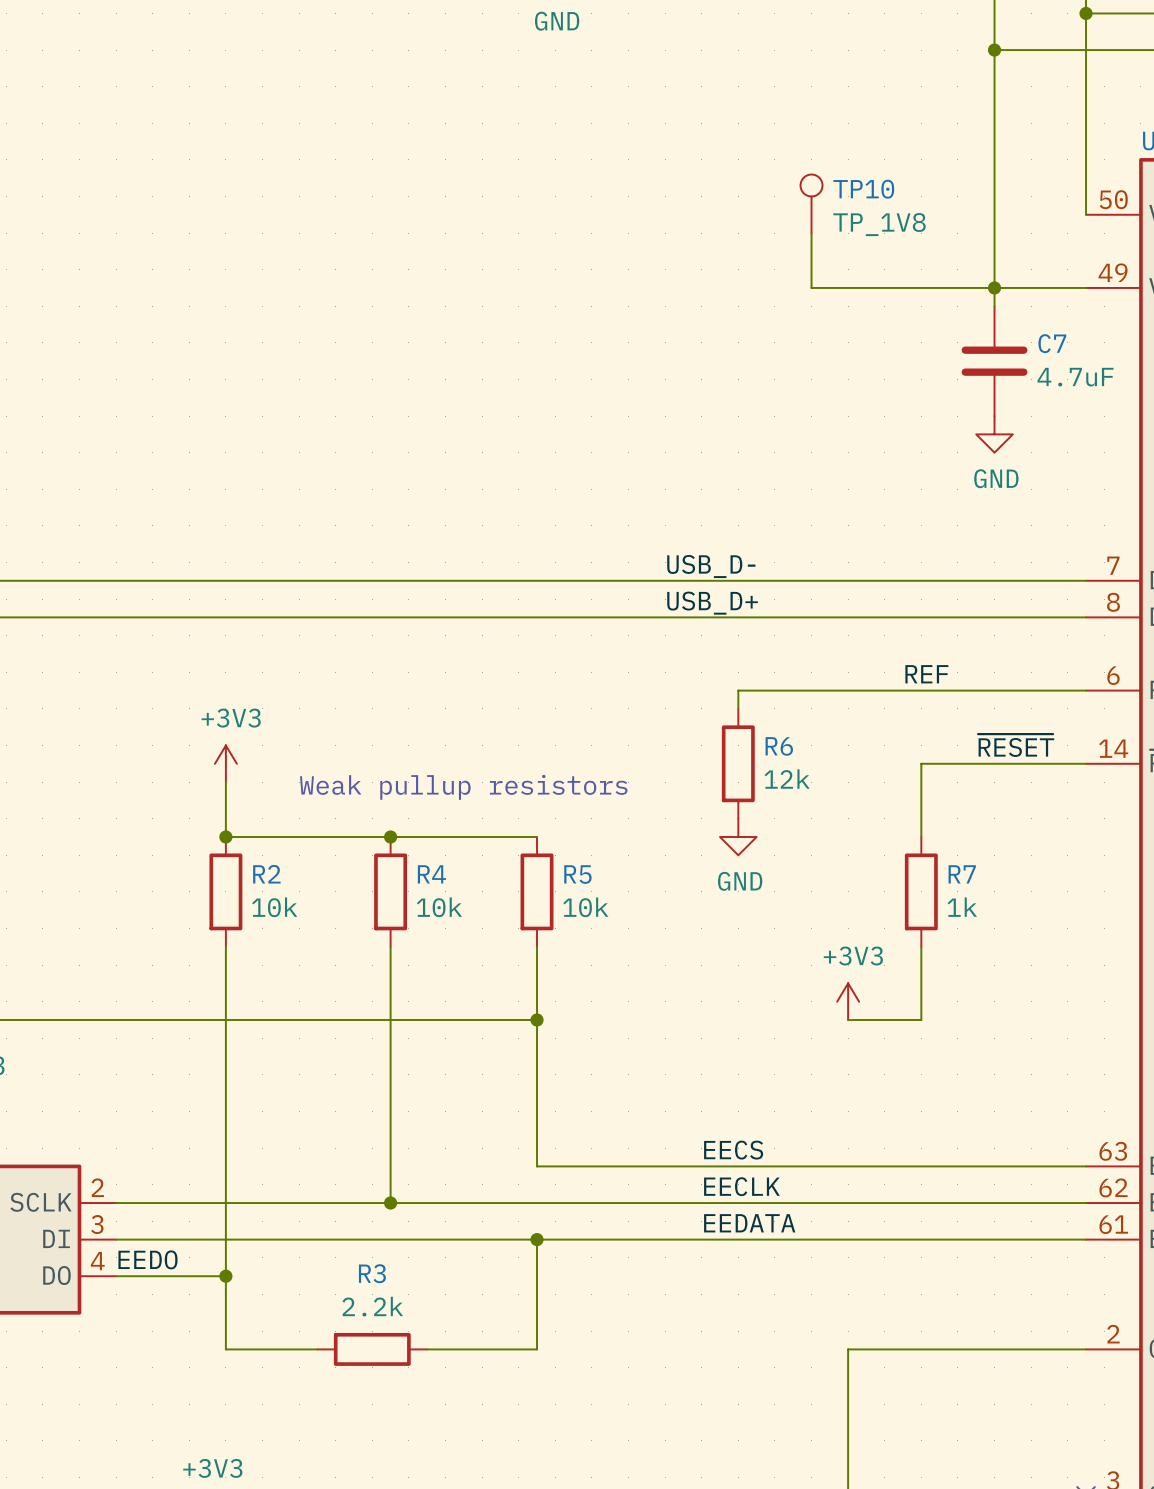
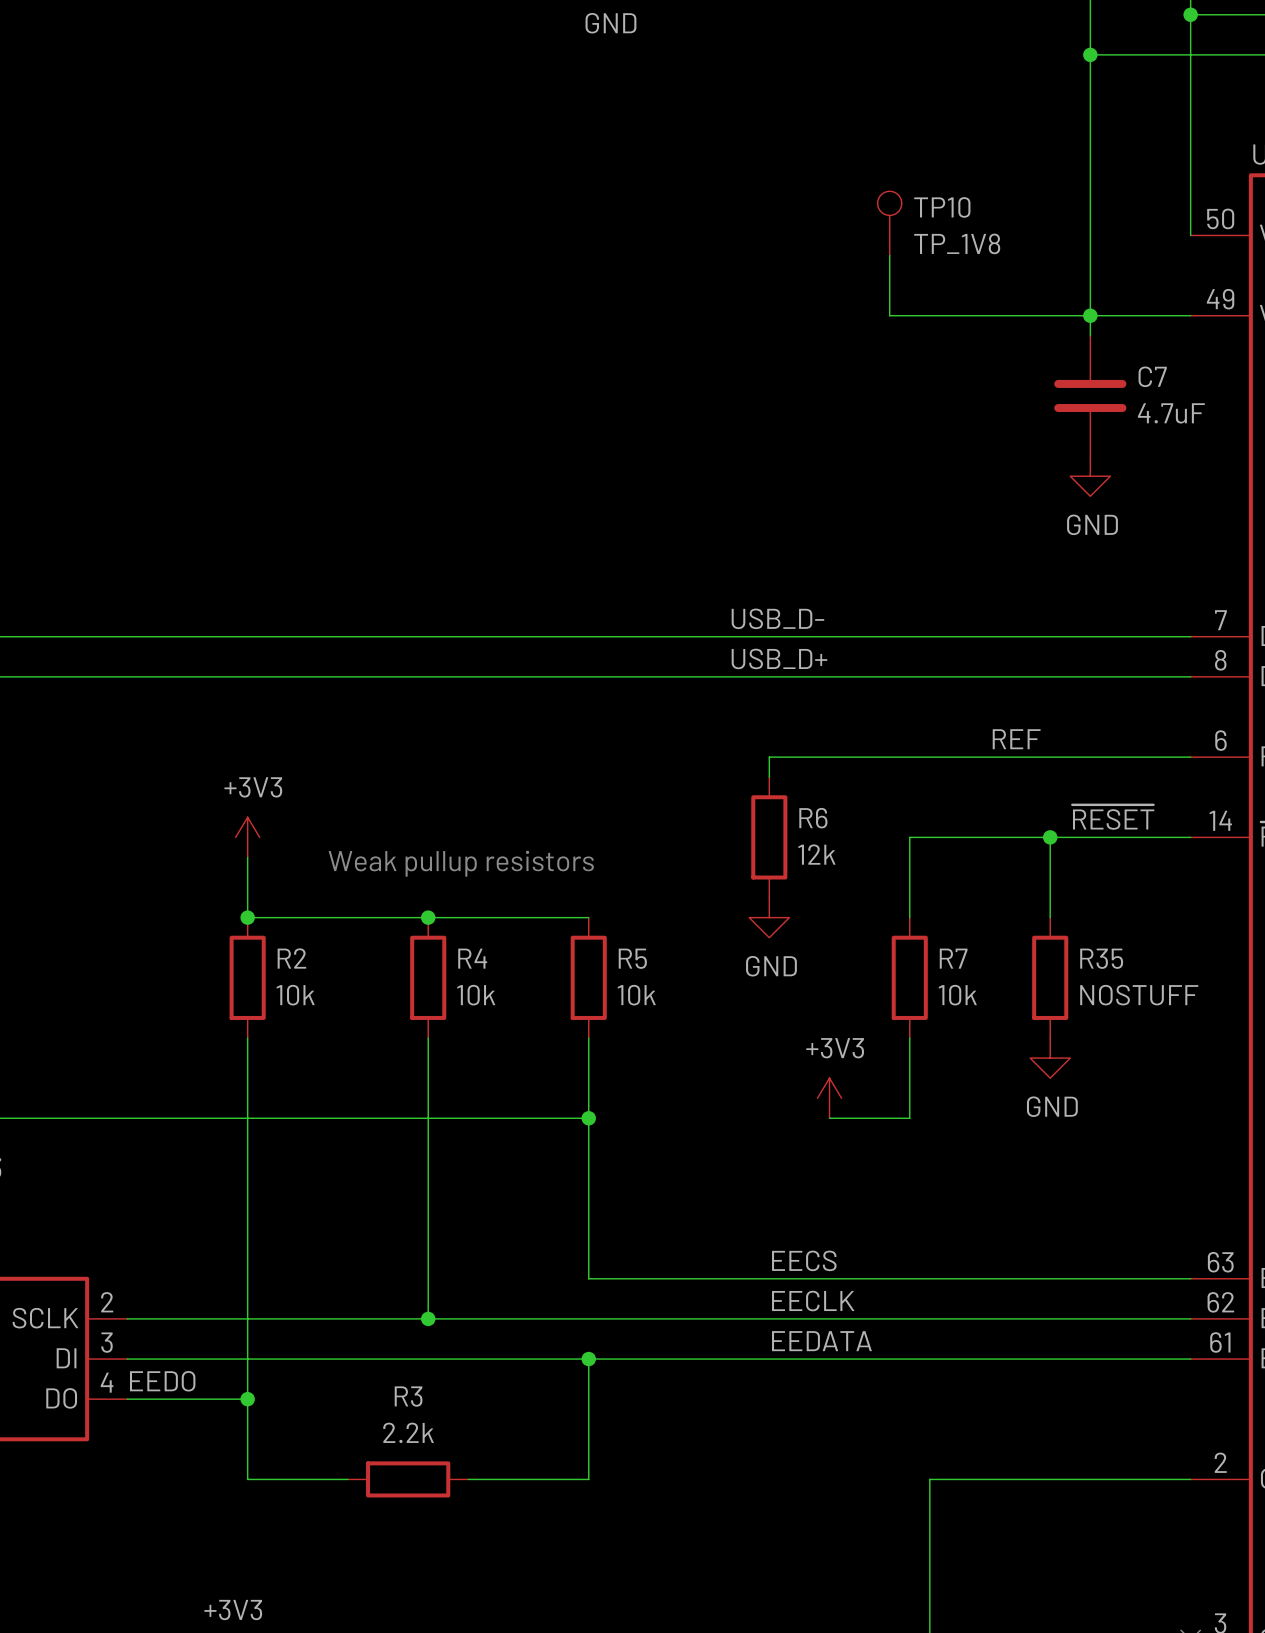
wire: (738, 690) (738, 708) -> (809, 757) (769, 757) (769, 777)
R6 position: (738, 763) -> (769, 837)
wire: (921, 763) (921, 837) -> (1010, 837) (909, 837) (909, 917)
wire: none -> (1050, 837) (1050, 917)
junction: none -> (1050, 837)
power symbol position: GND (738, 837) -> GND (769, 917)
R7 position: (921, 891) -> (909, 977)
R35: none -> NOSTUFF (1050, 977)
R7 value: 1k (962, 907) -> 10k (957, 995)
wire: (921, 946) (921, 1020) (848, 1020) -> (909, 1038) (909, 1118) (829, 1118)
power symbol: none -> GND (1050, 1058)
power symbol position: +3V3 (848, 1001) -> +3V3 (829, 1098)

